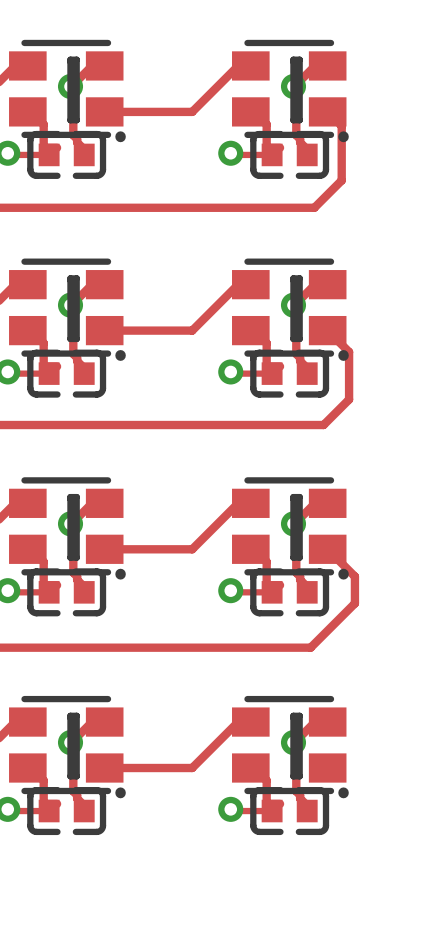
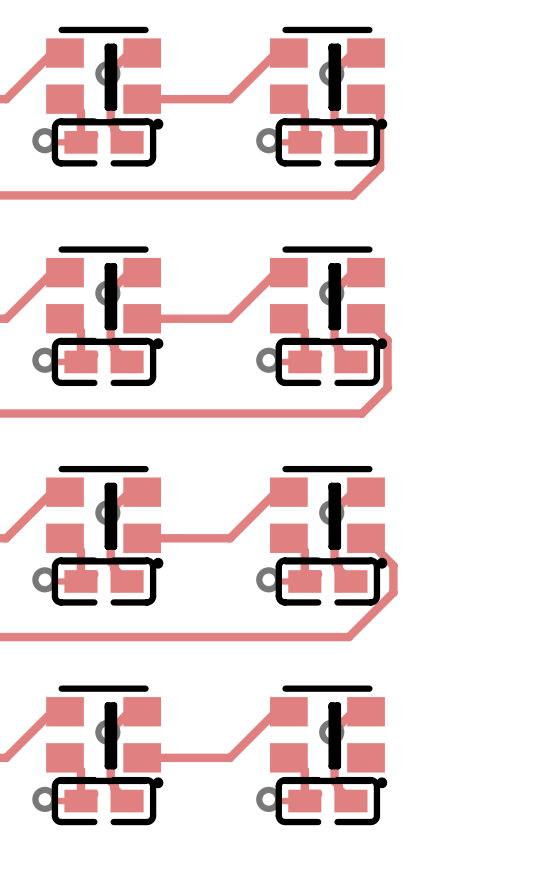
part footprint: [27, 130, 107, 179] -> [51, 118, 157, 167]
part footprint: [250, 130, 330, 179] -> [275, 118, 381, 167]
part footprint: [27, 349, 107, 398] -> [51, 337, 157, 387]
part footprint: [250, 349, 330, 398] -> [275, 337, 381, 387]
part footprint: [27, 568, 107, 617] -> [51, 557, 157, 606]
part footprint: [250, 568, 330, 617] -> [275, 557, 381, 606]
part footprint: [27, 787, 107, 836] -> [51, 776, 157, 826]
part footprint: [250, 787, 330, 836] -> [275, 776, 381, 826]

